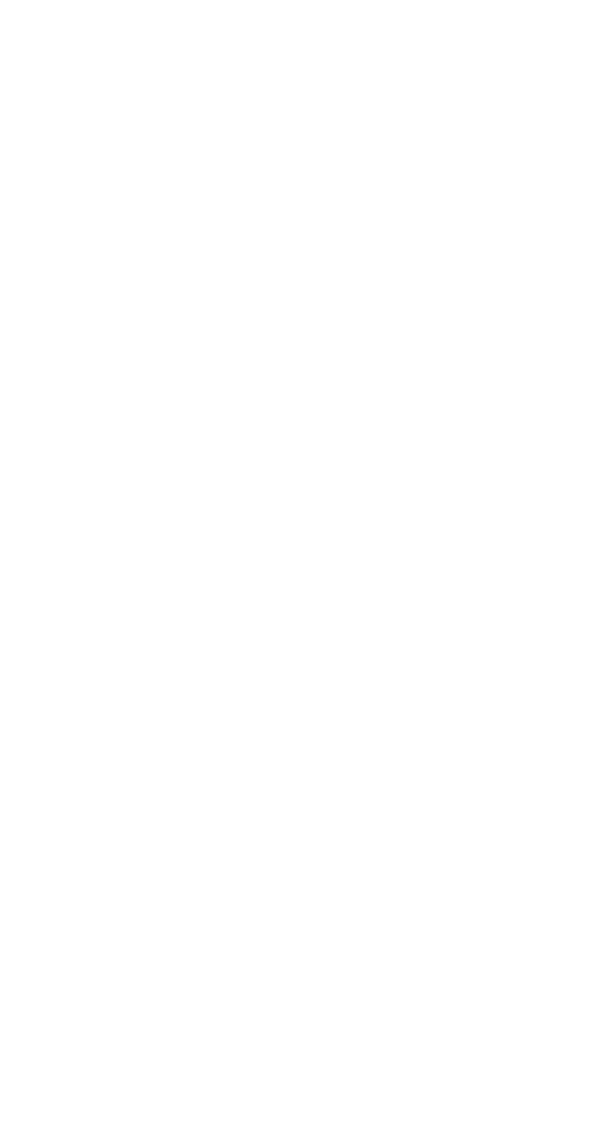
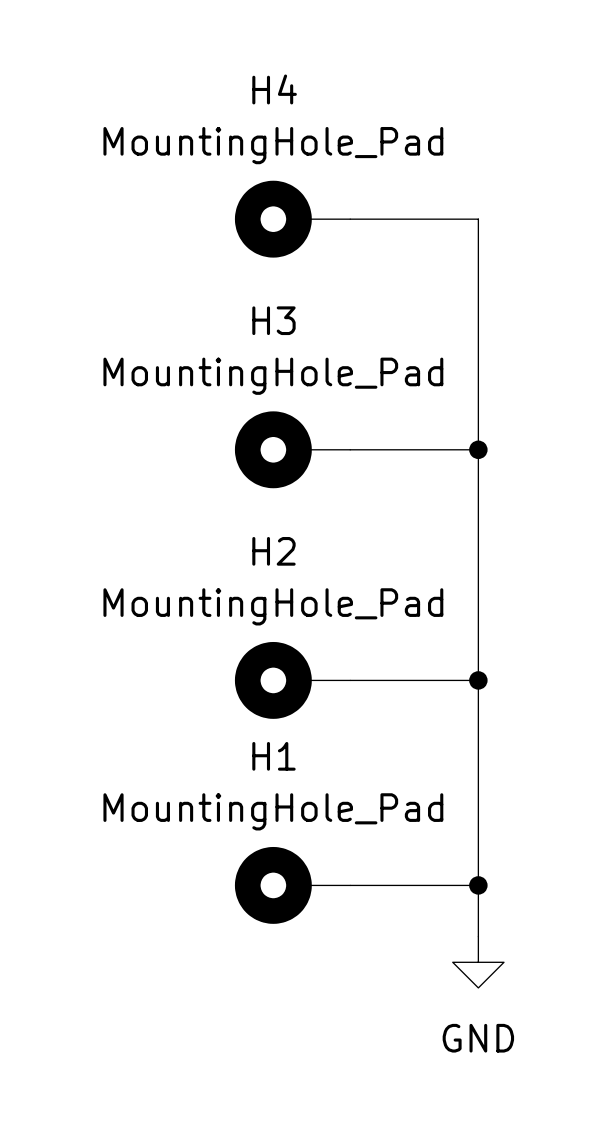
H4: none -> MountingHole_Pad (292, 219)
wire: none -> (350, 219) (478, 219) (478, 936)
H3: none -> MountingHole_Pad (292, 449)
wire: none -> (350, 449) (478, 449)
junction: none -> (478, 449)
H2: none -> MountingHole_Pad (292, 680)
wire: none -> (350, 680) (478, 680)
junction: none -> (478, 680)
H1: none -> MountingHole_Pad (292, 885)
wire: none -> (350, 885) (478, 885)
junction: none -> (478, 885)
power symbol: none -> GND (478, 962)

